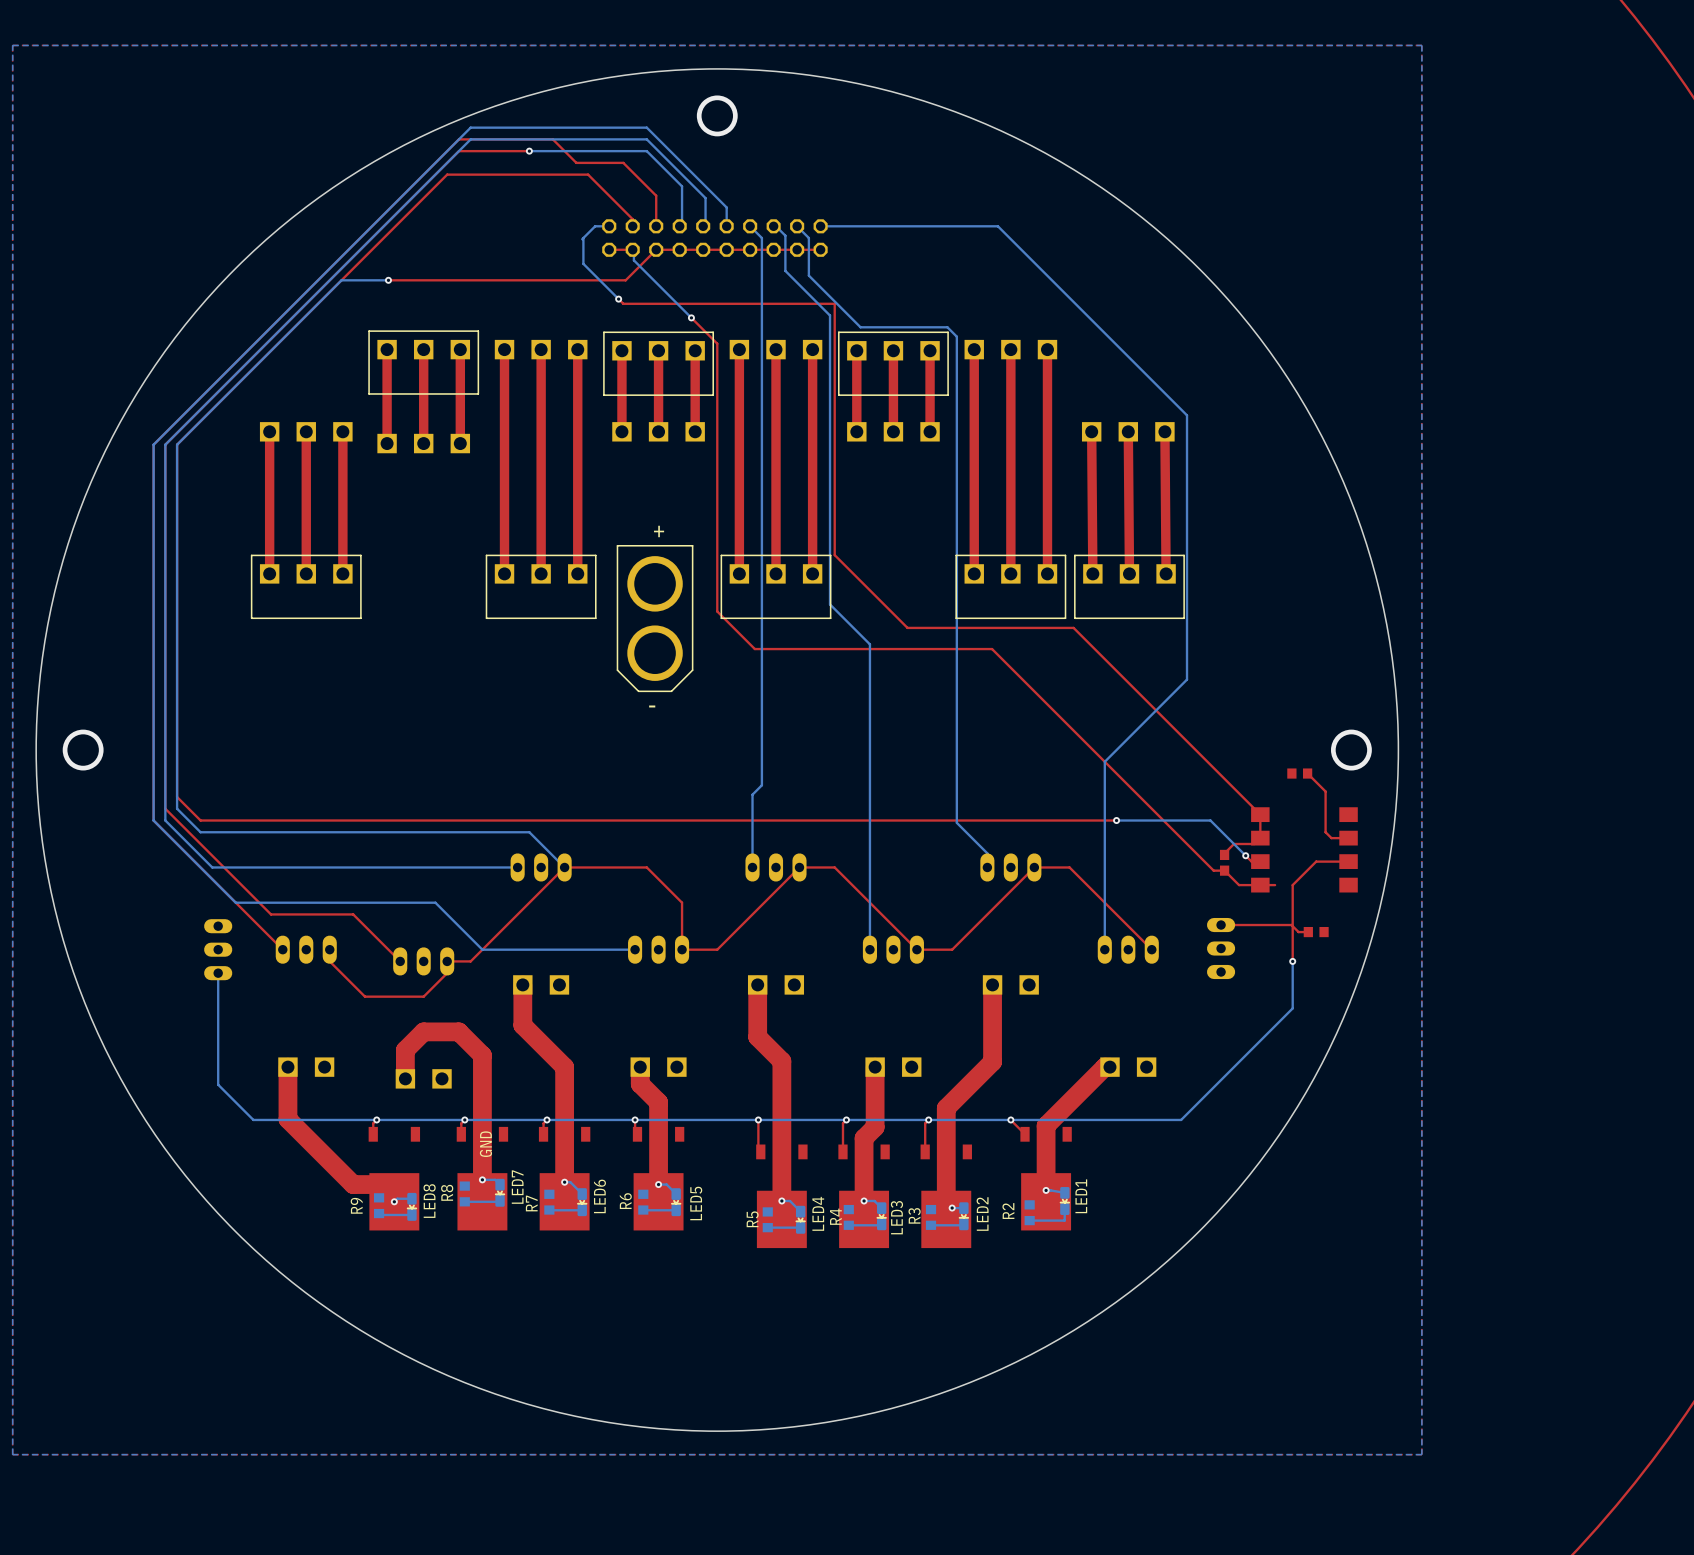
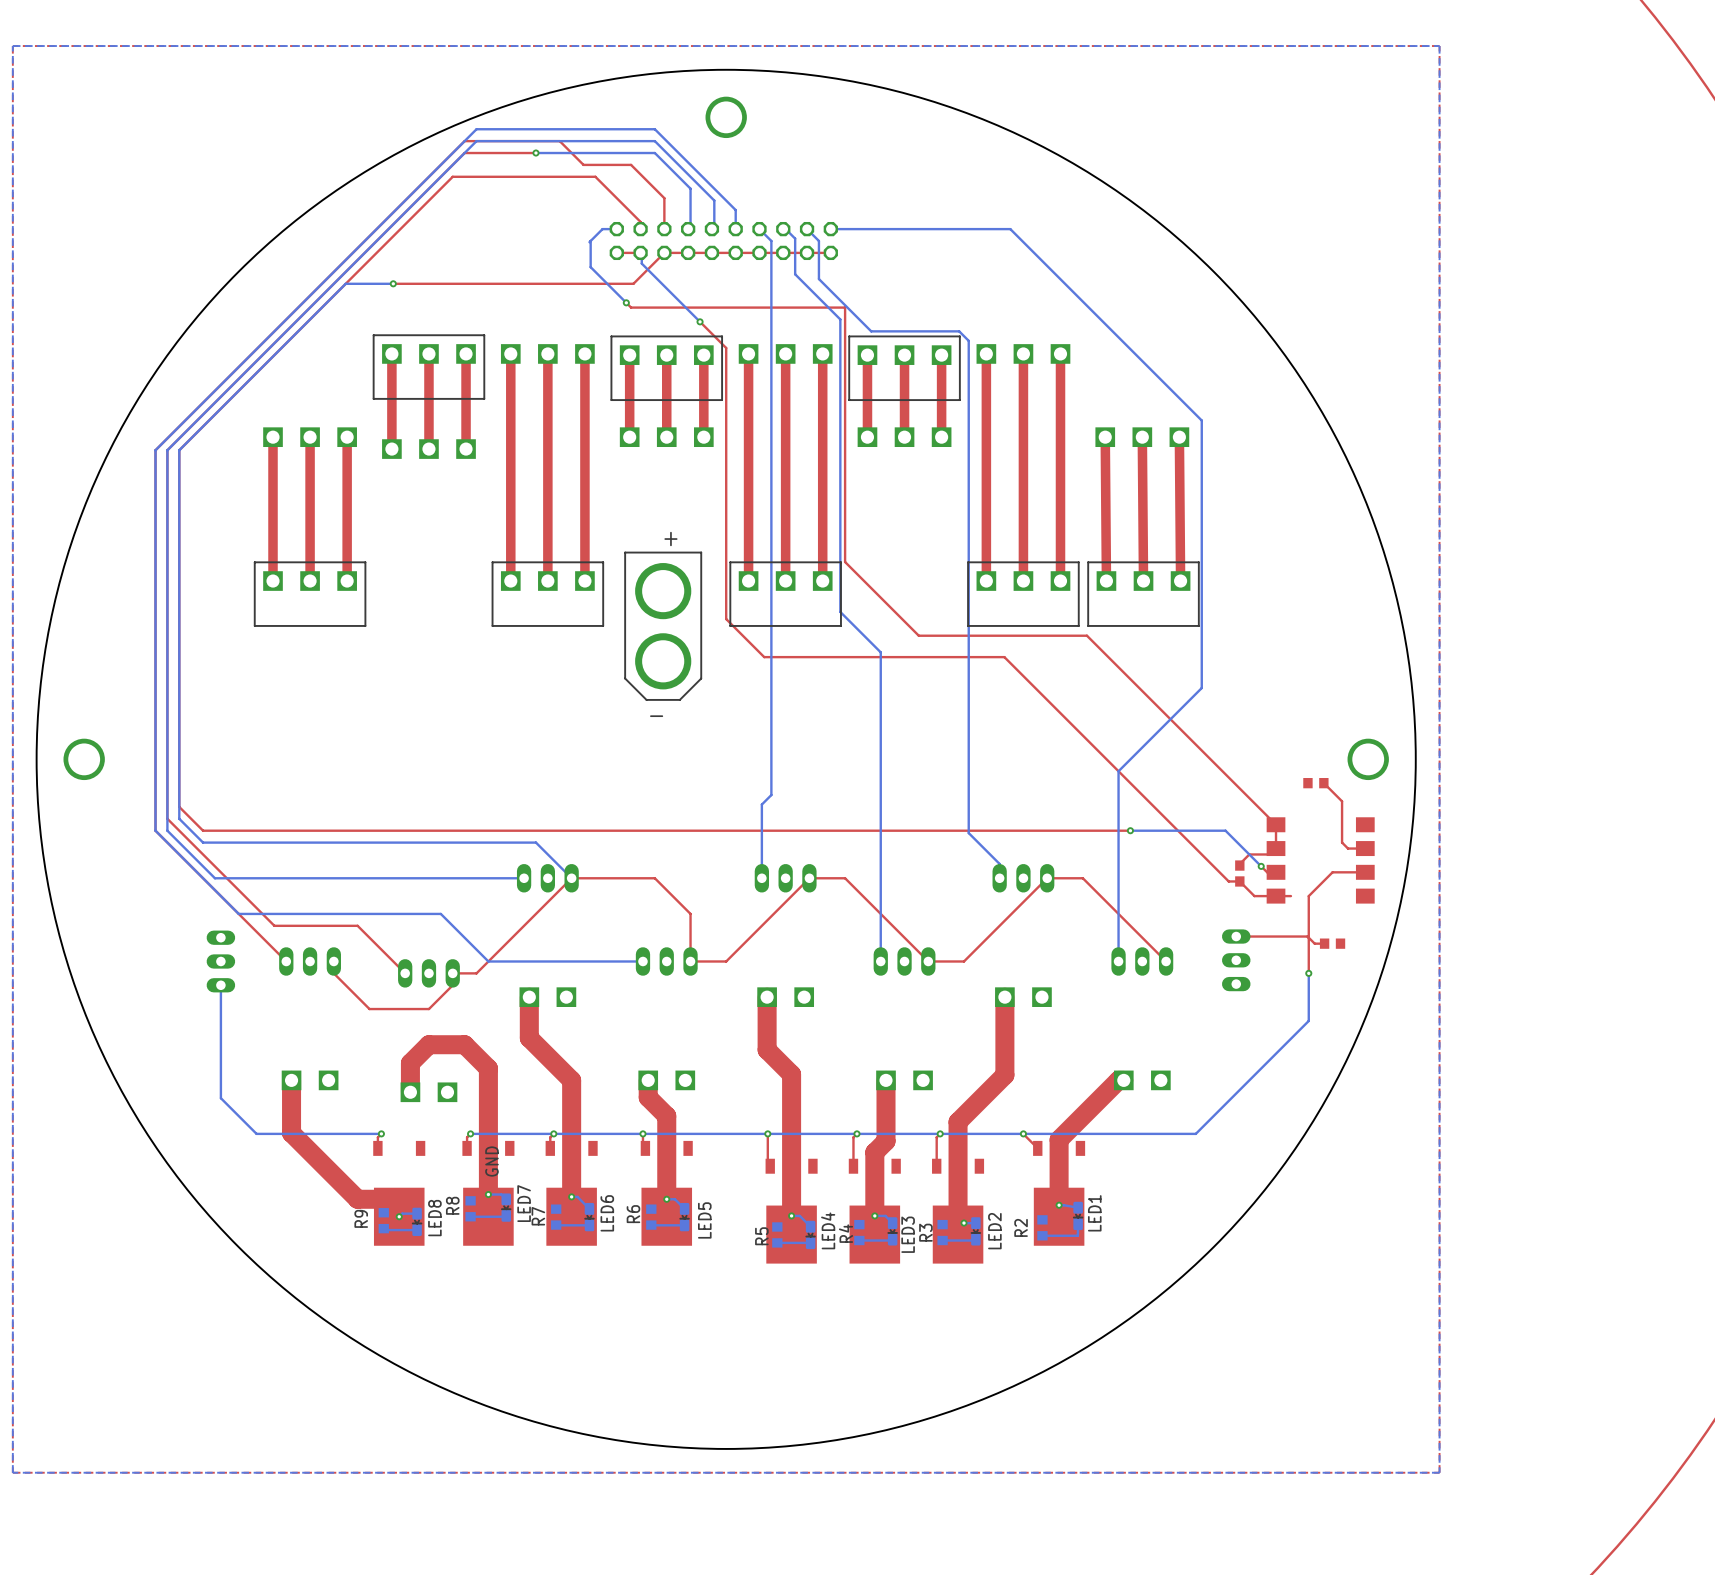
bottom track: (464, 1119) (376, 1119) -> none

